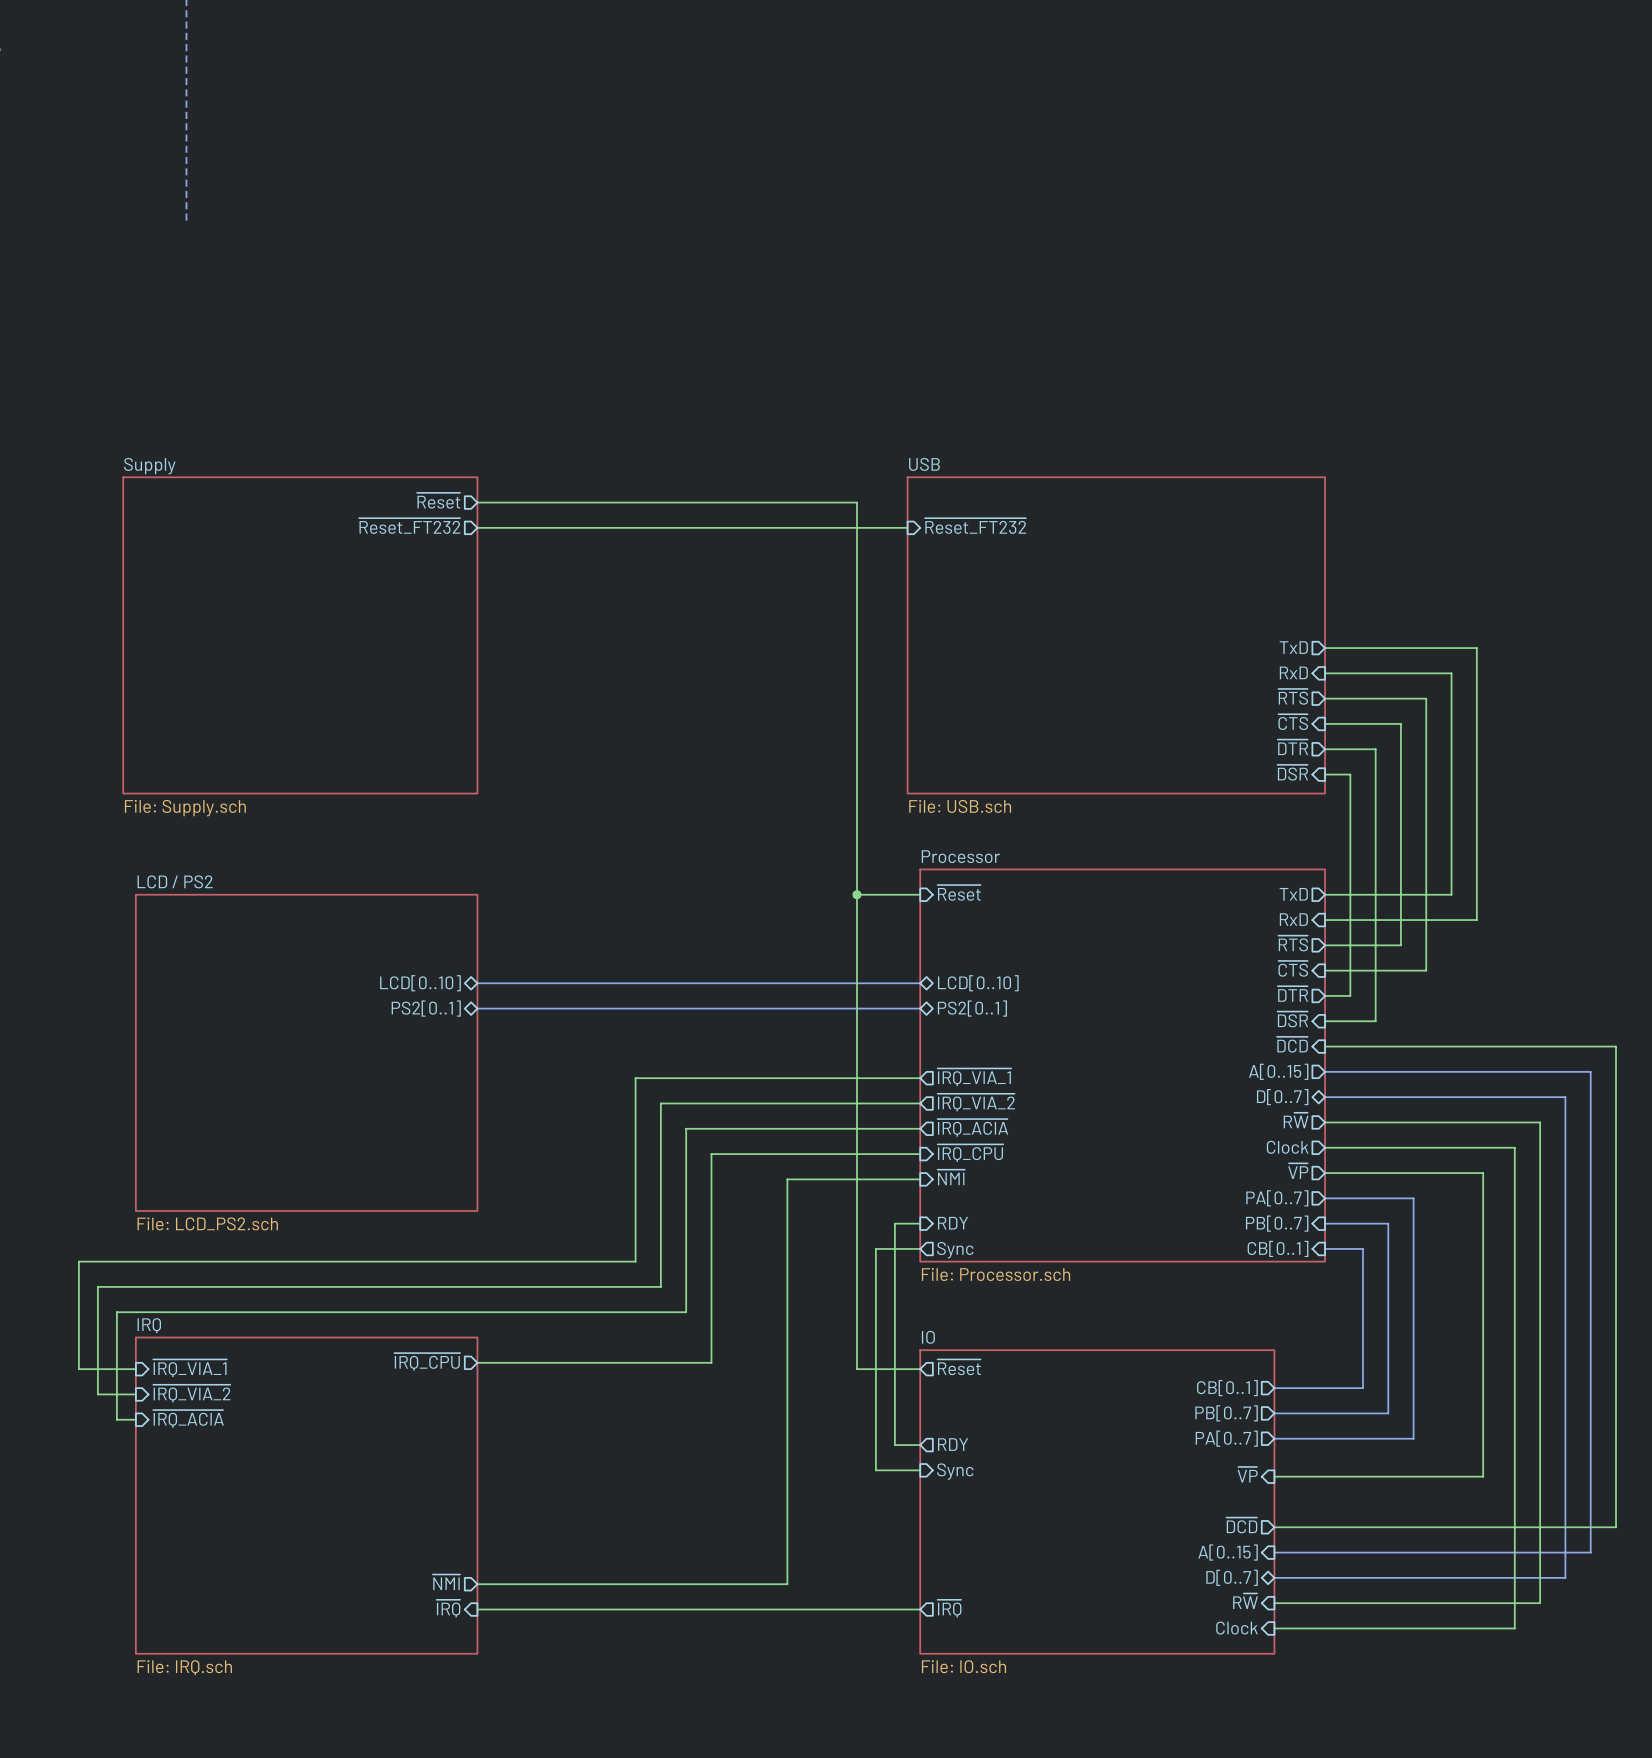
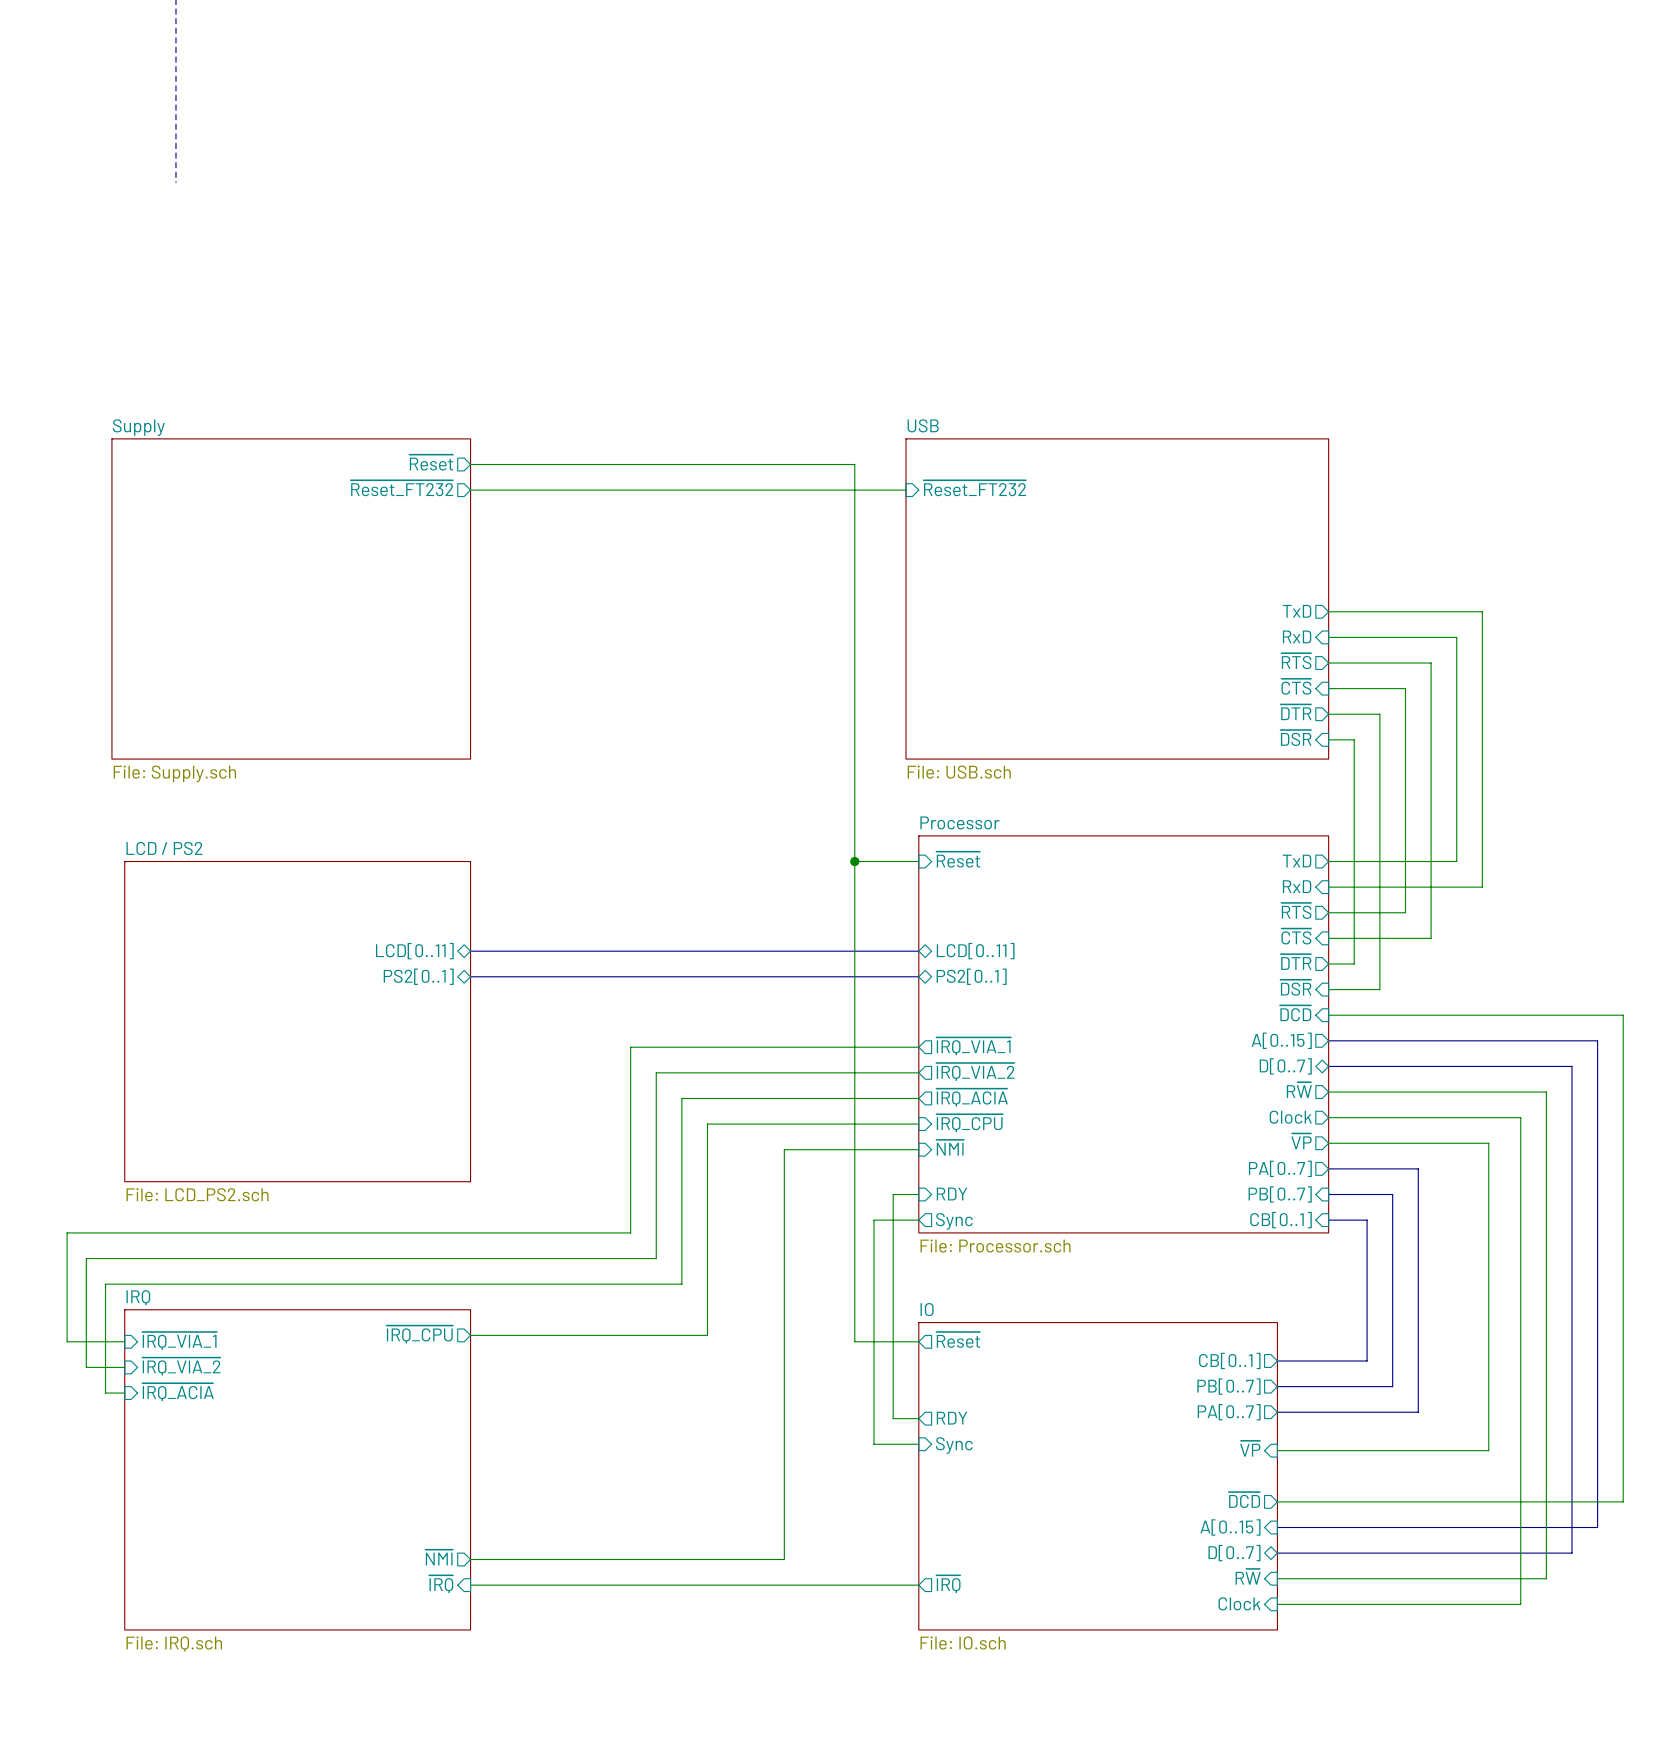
sheet pin: LCD[0..10] (420, 983) -> LCD[0..11] (414, 951)
sheet pin: LCD[0..10] (978, 983) -> LCD[0..11] (975, 951)

